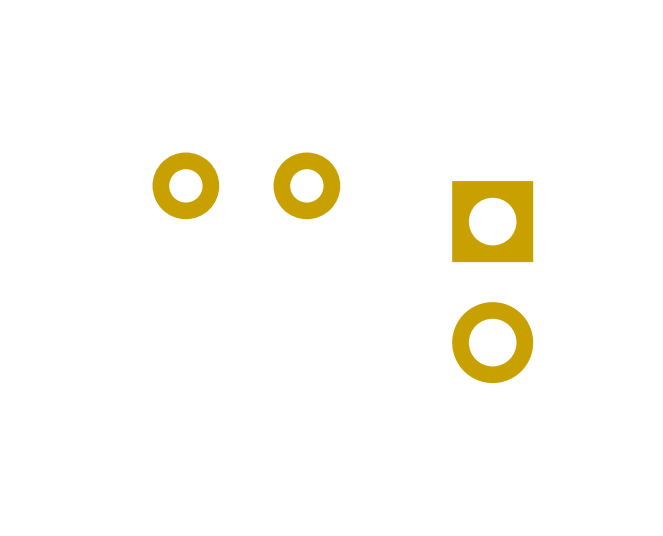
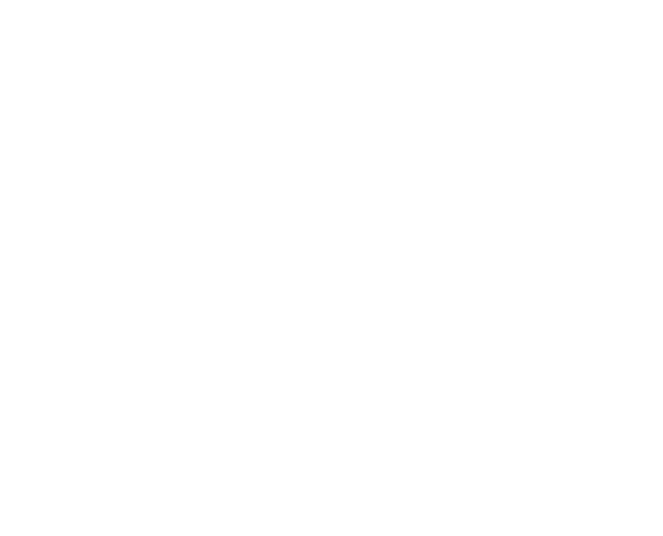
part: (246, 185) -> none
part: (492, 282) -> none

